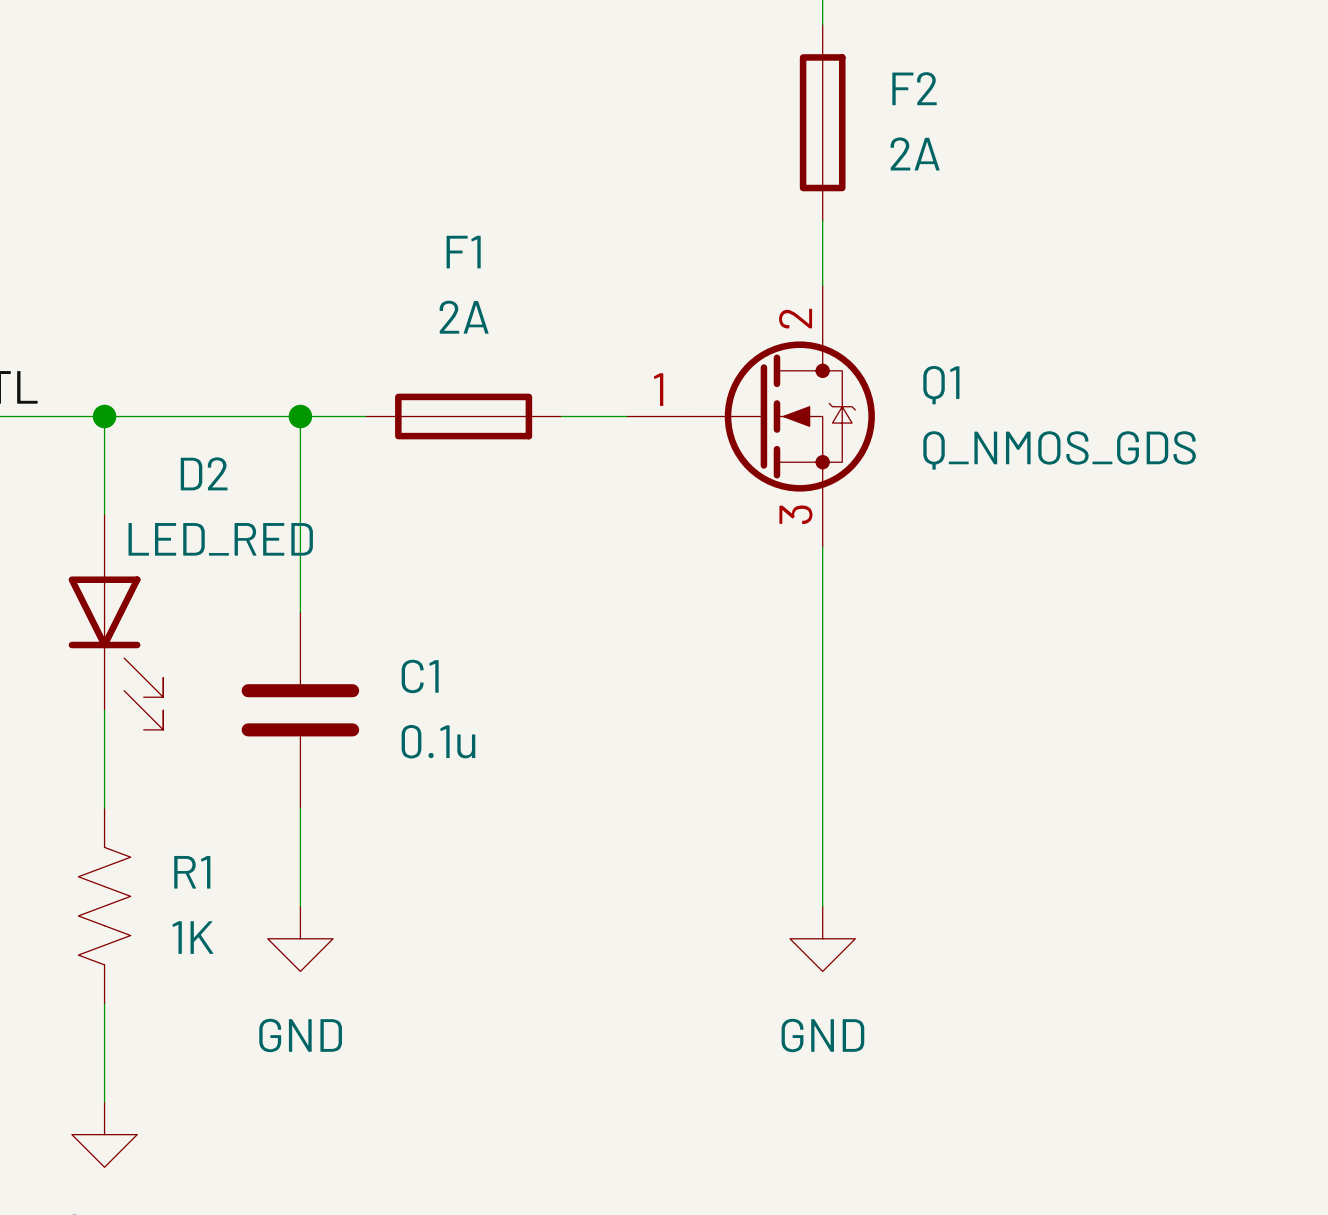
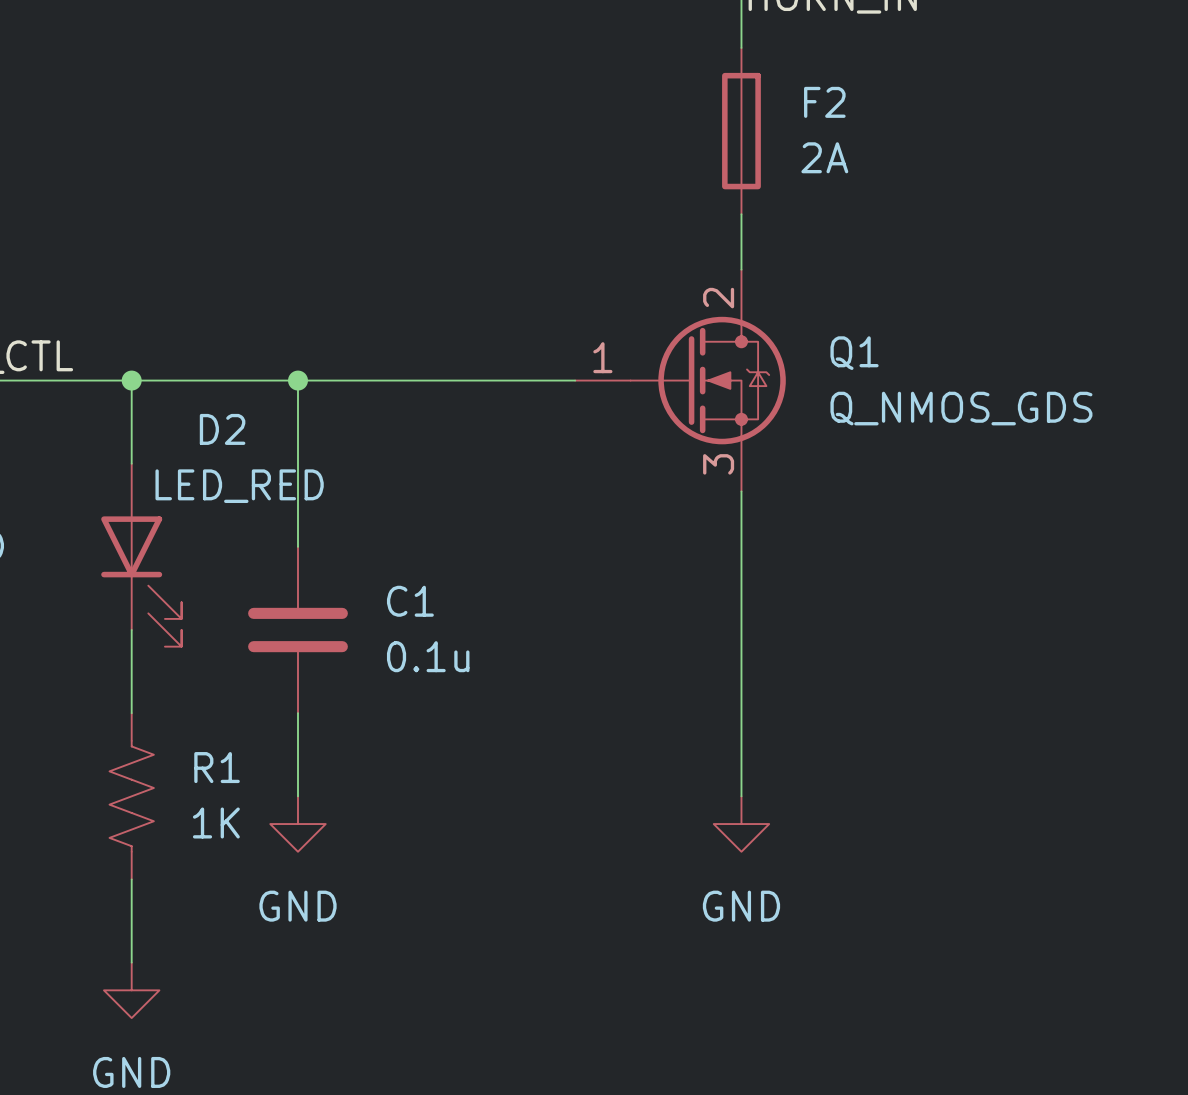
F1: 2A (463, 416) -> none

